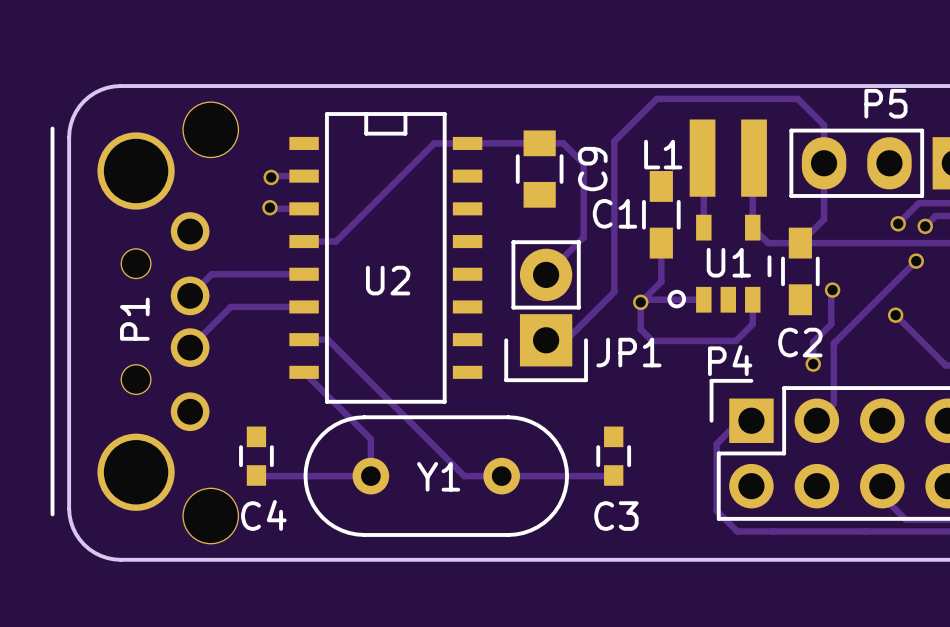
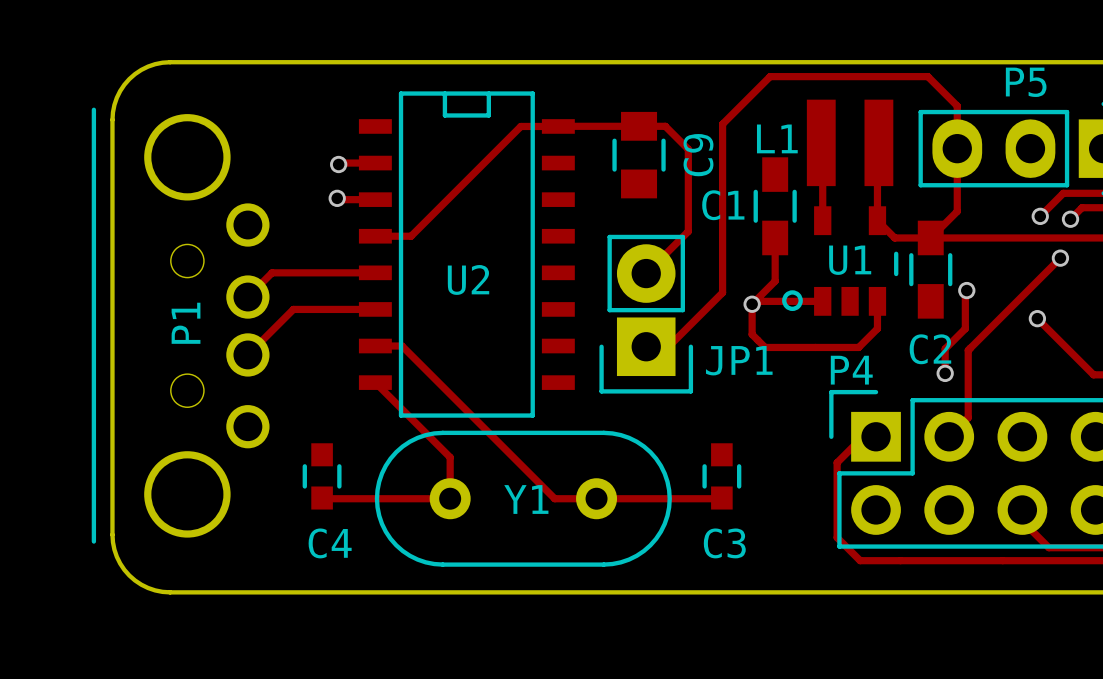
part: (210, 129) -> none
part: (210, 516) -> none

